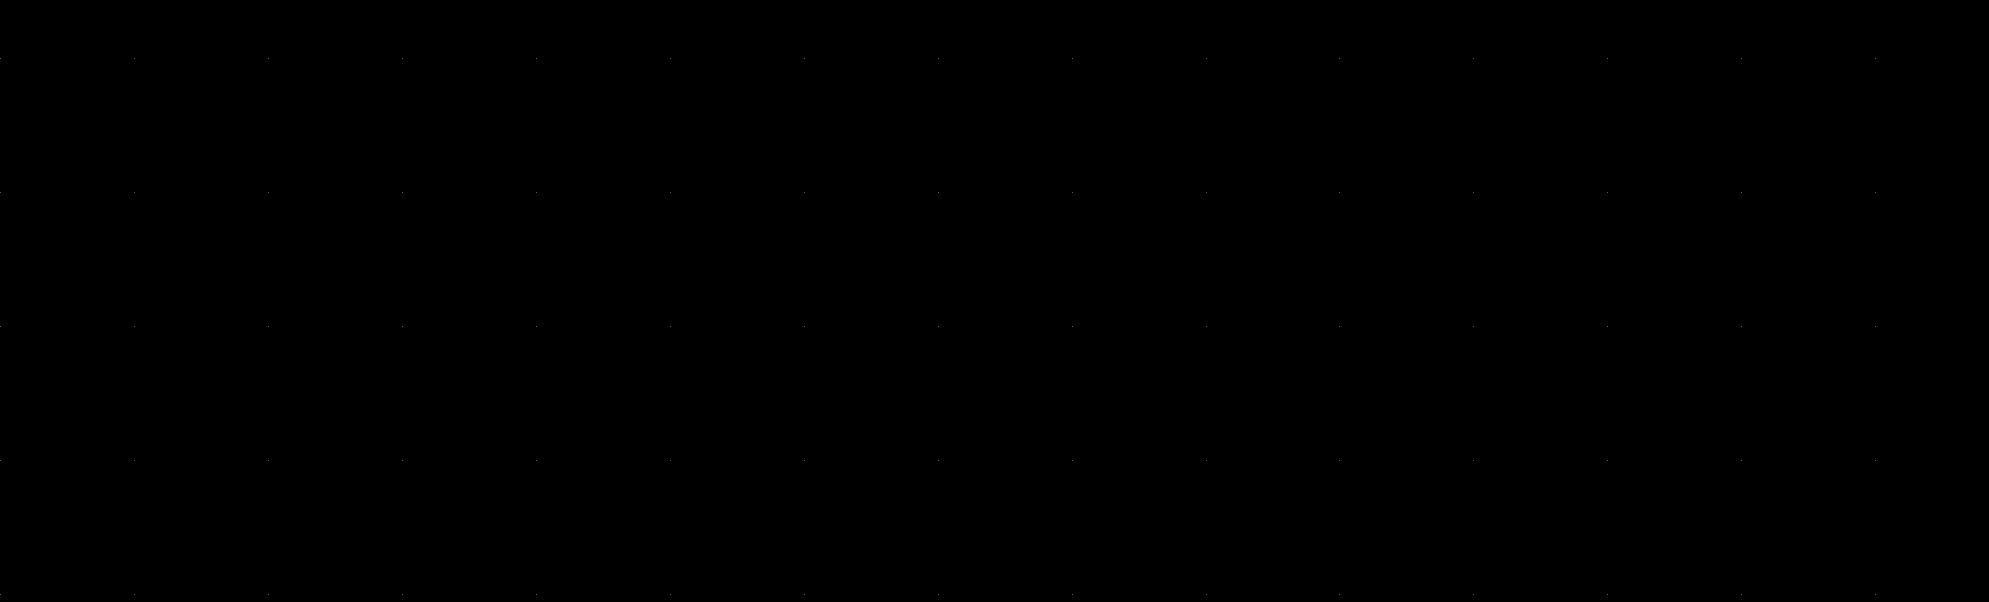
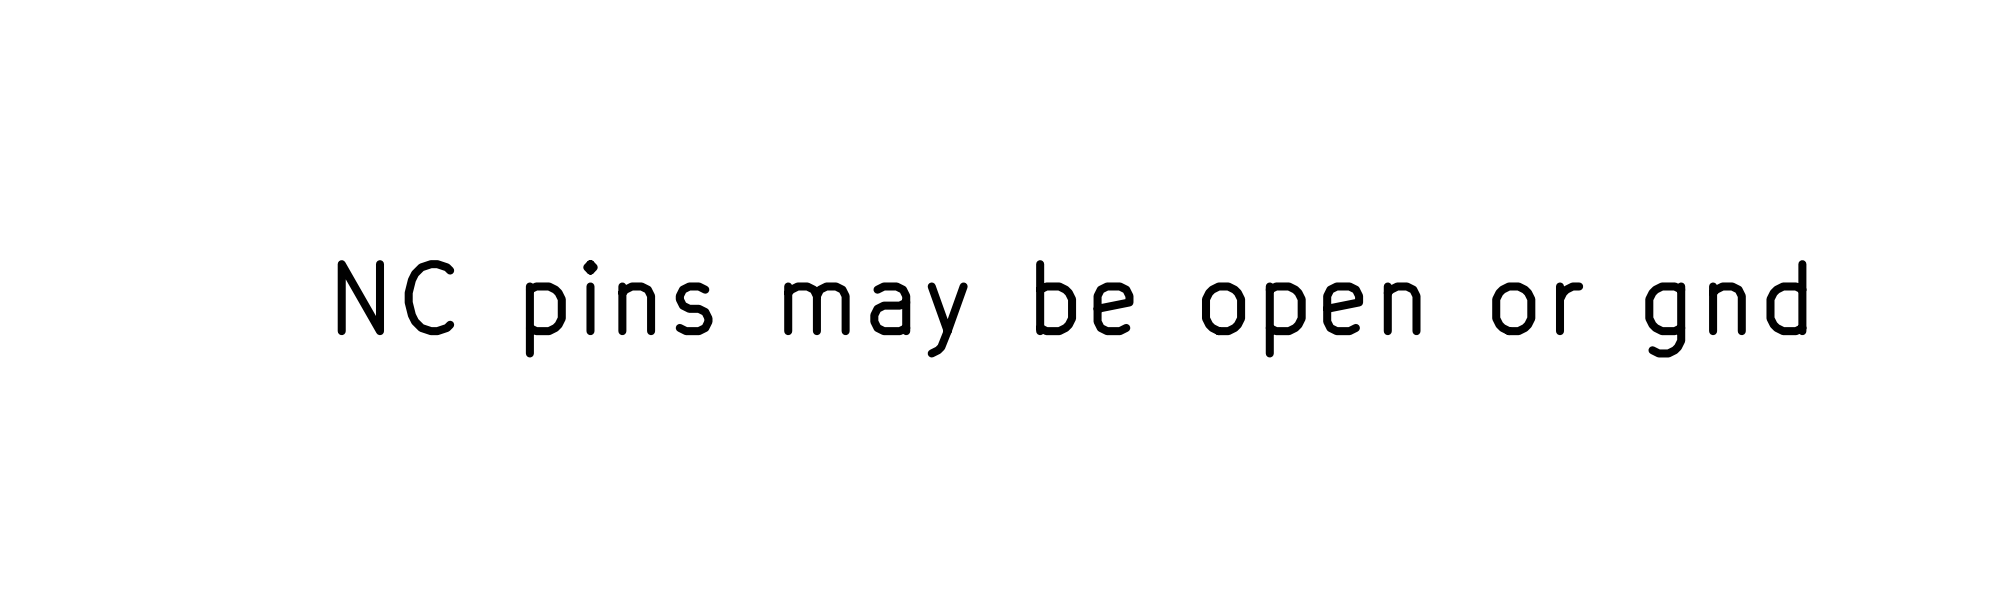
text: none -> NC pins may be open or gnd (1072, 308)

